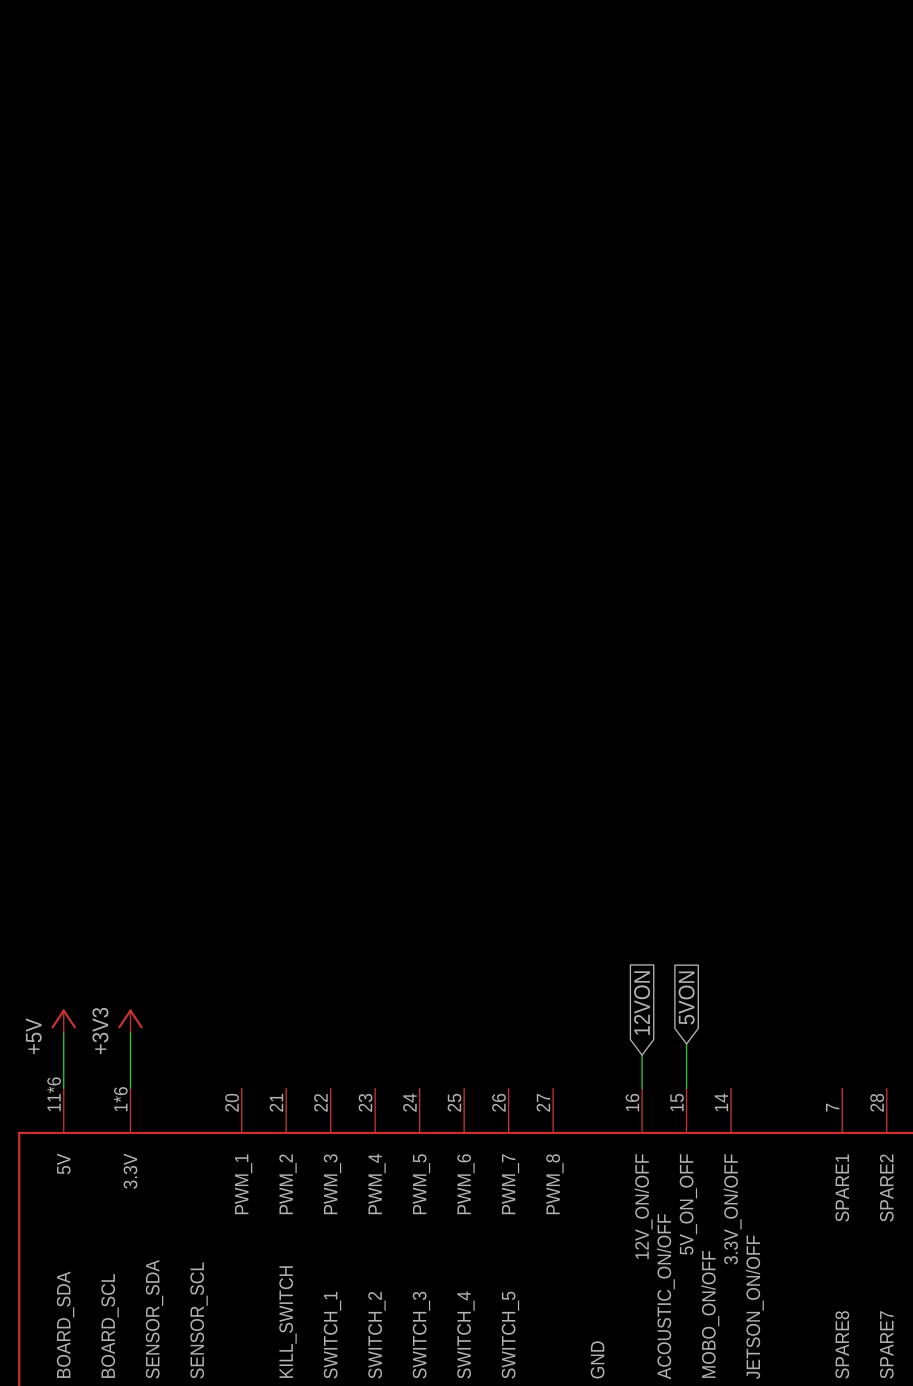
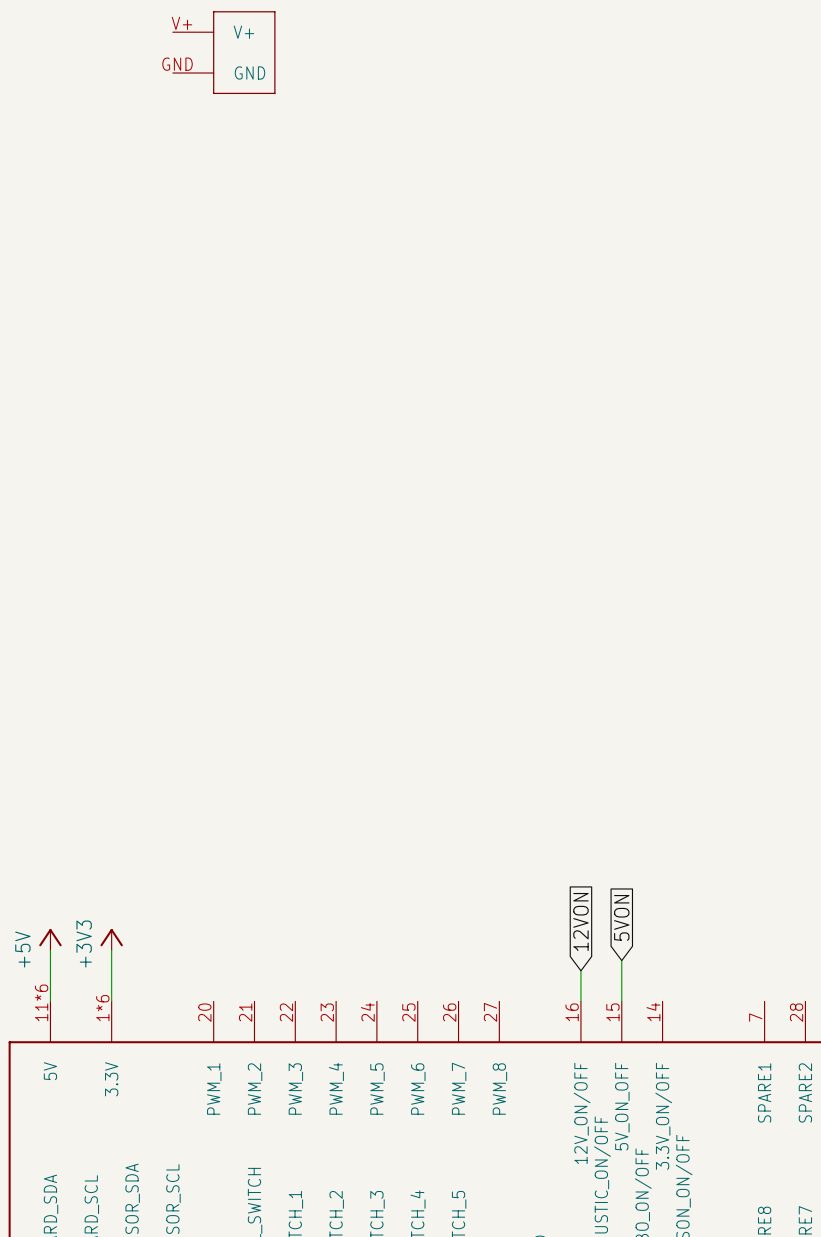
part: none -> (224, 52)

